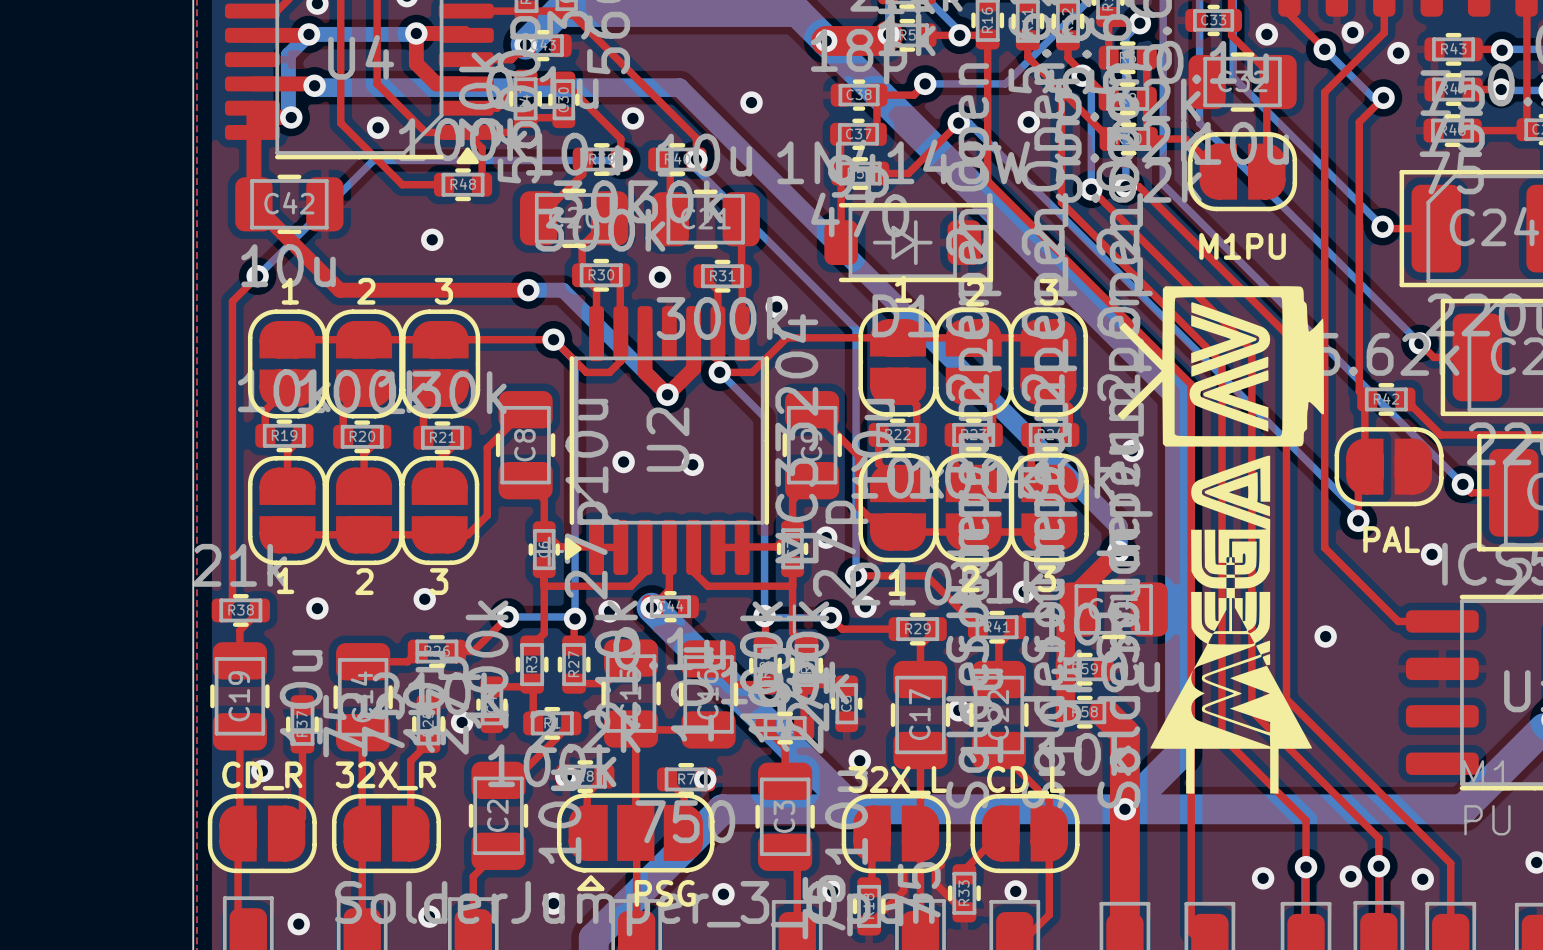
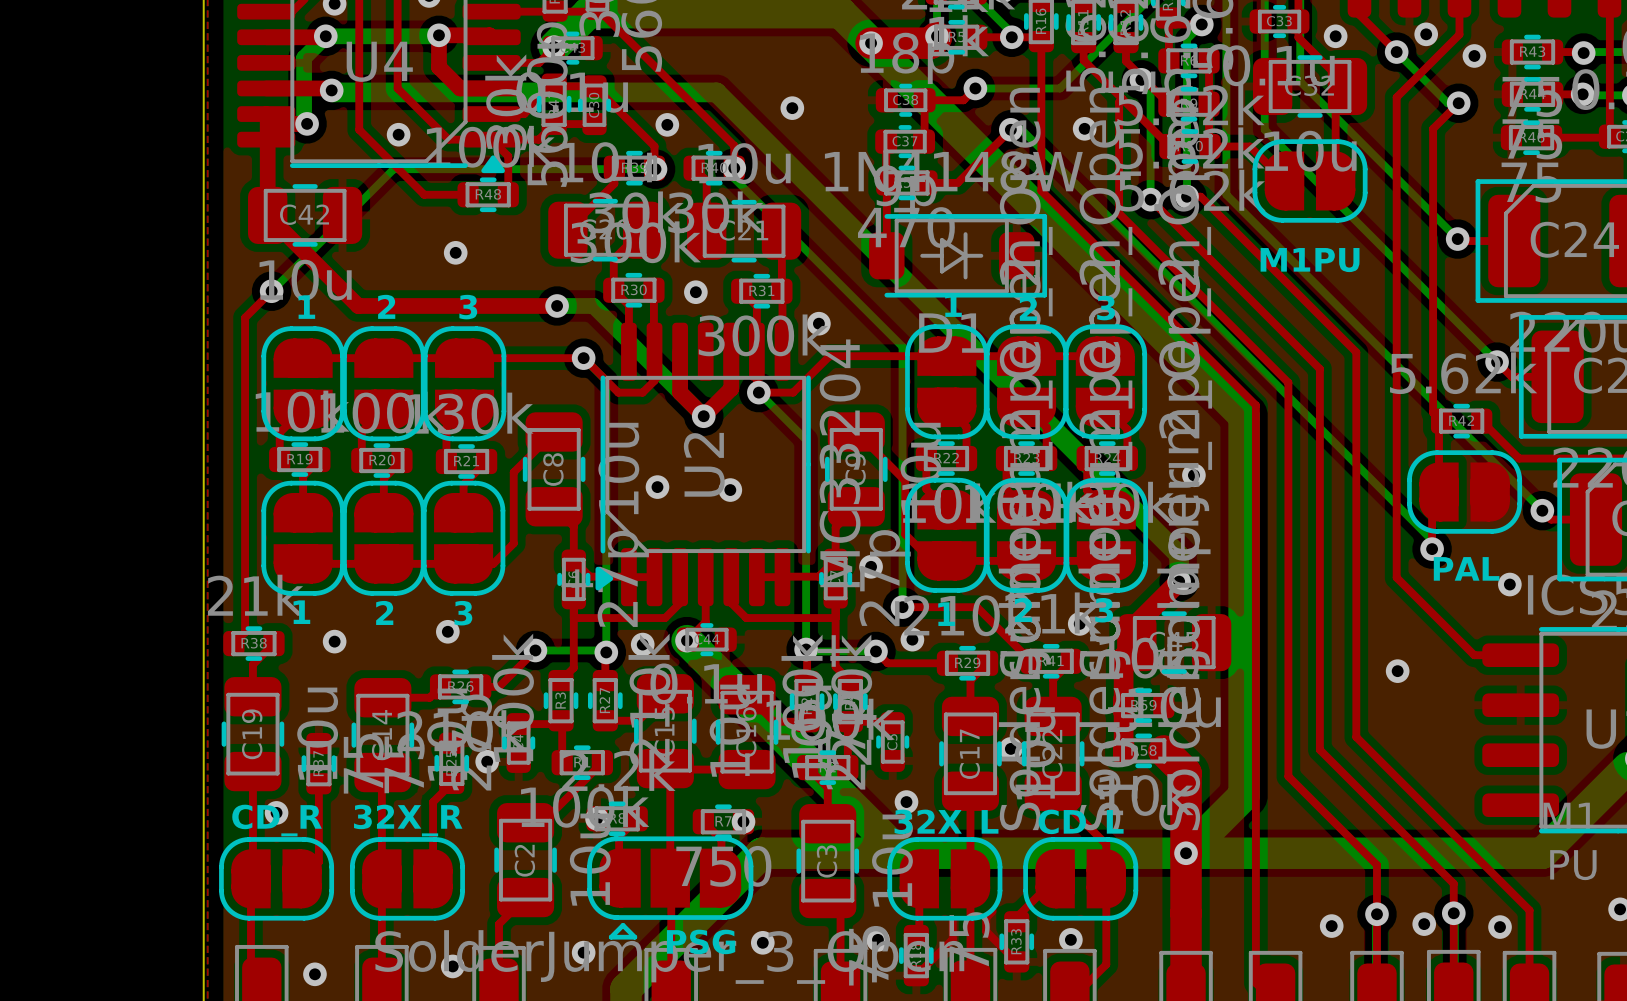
drawing: [1117, 286, 1324, 794] -> none

